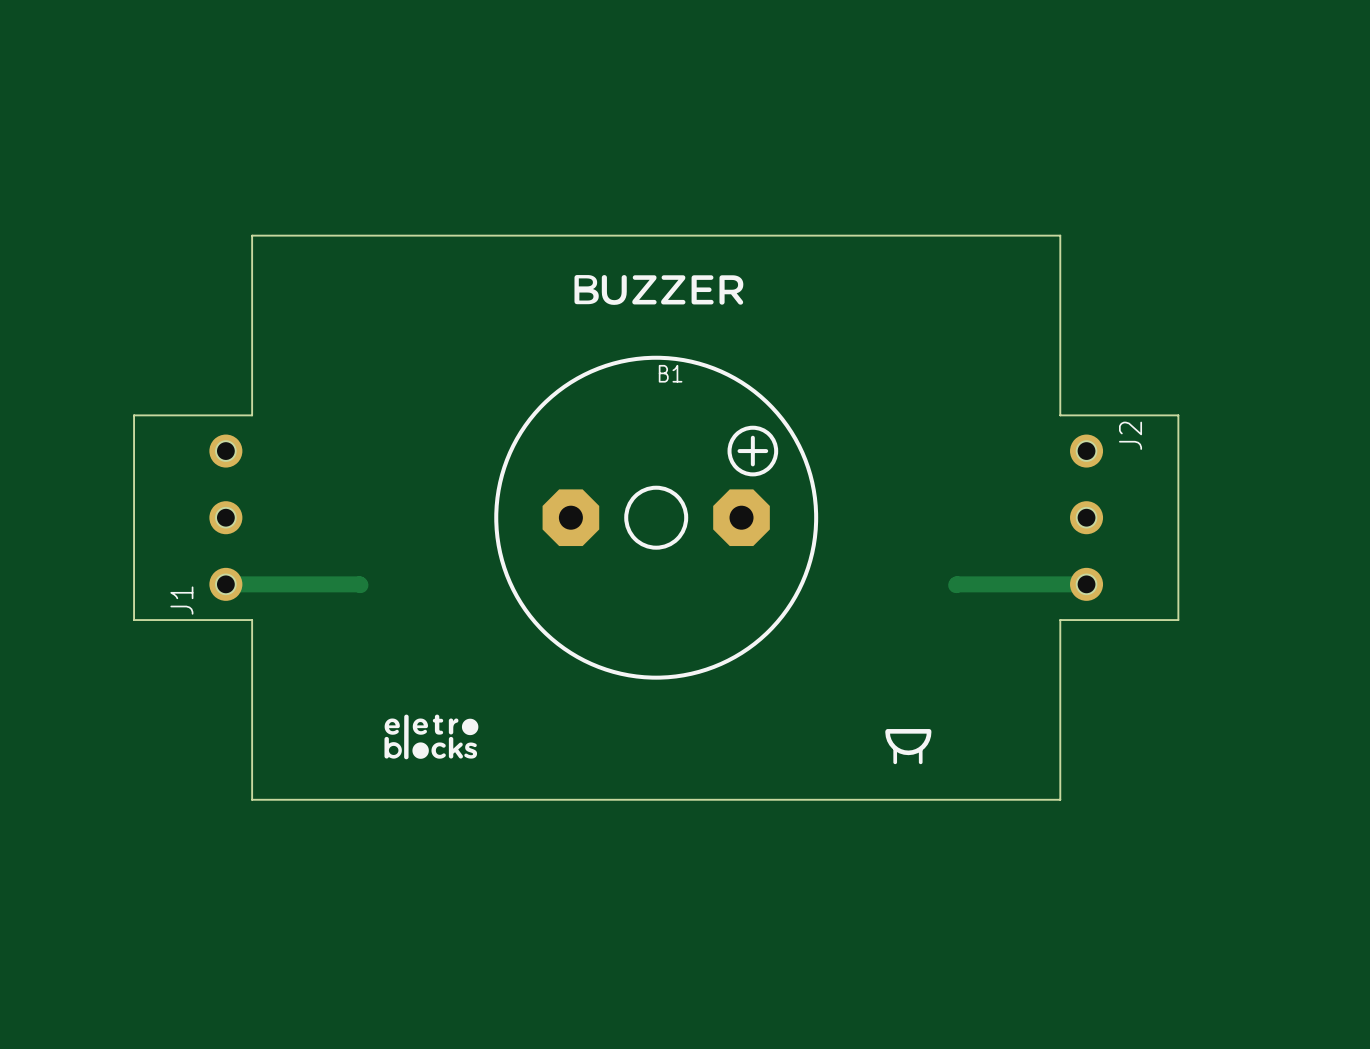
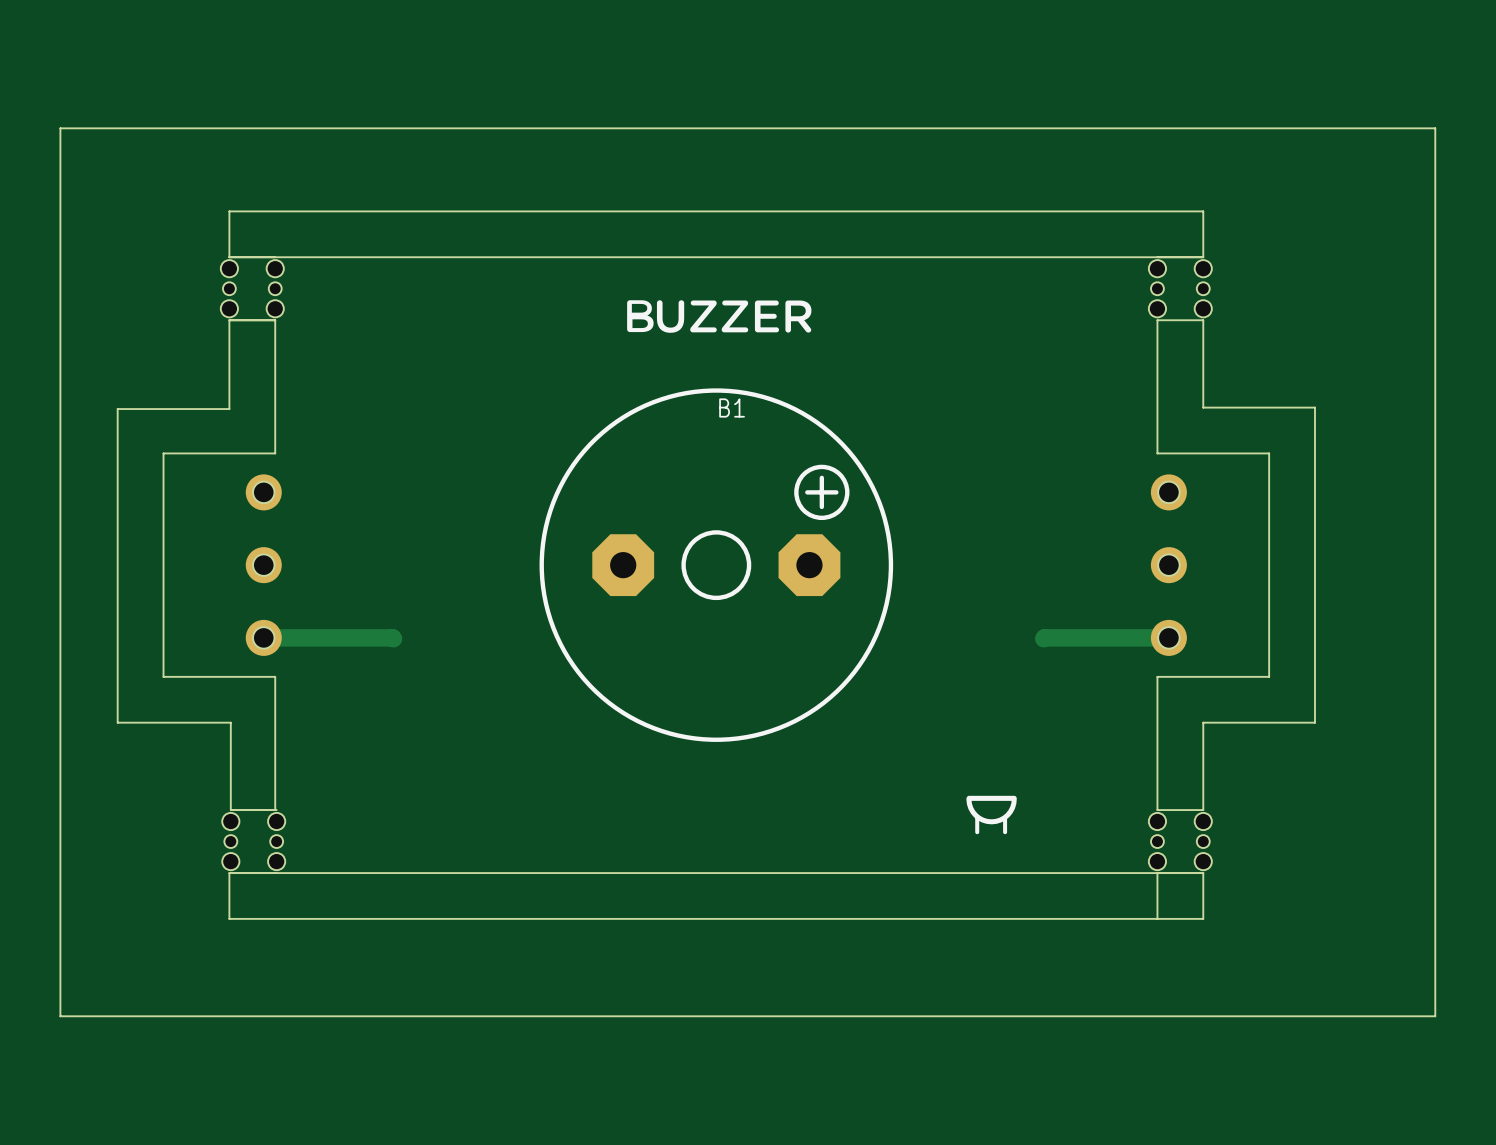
board edge: none -> (60, 128) (60, 1016) (1435, 1016) (1435, 128) (60, 128)
board edge: (252, 235) (252, 293) -> (275, 810) (230, 810) (230, 722) (117, 722) (117, 409) (229, 409) (229, 320) (275, 320)
board edge: (1060, 235) (1060, 293) -> (1157, 257) (1203, 257) (1203, 211) (229, 211) (229, 257) (275, 257)
part: none -> (252, 288)
part: none -> (1180, 288)
board edge: none -> (1203, 320) (1203, 407) (1314, 407) (1314, 722) (1203, 722) (1203, 810)
board edge: (149, 415) (134, 415) (134, 620) (149, 620) -> (163, 453) (163, 676)
board edge: (1162, 415) (1178, 415) (1178, 620) (1162, 620) -> (1269, 453) (1269, 676)
J2 name: J2 (1130, 435) -> none
J1 position: (225, 517) -> (263, 565)
J2 position: (1086, 517) -> (1168, 565)
J1 name: J1 (181, 600) -> none
drawing: [384, 714, 479, 760] -> none
board edge: (252, 742) (252, 799) -> (1157, 918) (1157, 873) (1203, 873) (1203, 918) (229, 918) (229, 873) (275, 873)
board edge: (1060, 742) (1060, 799) -> none
part: none -> (253, 841)
part: none -> (1180, 841)

